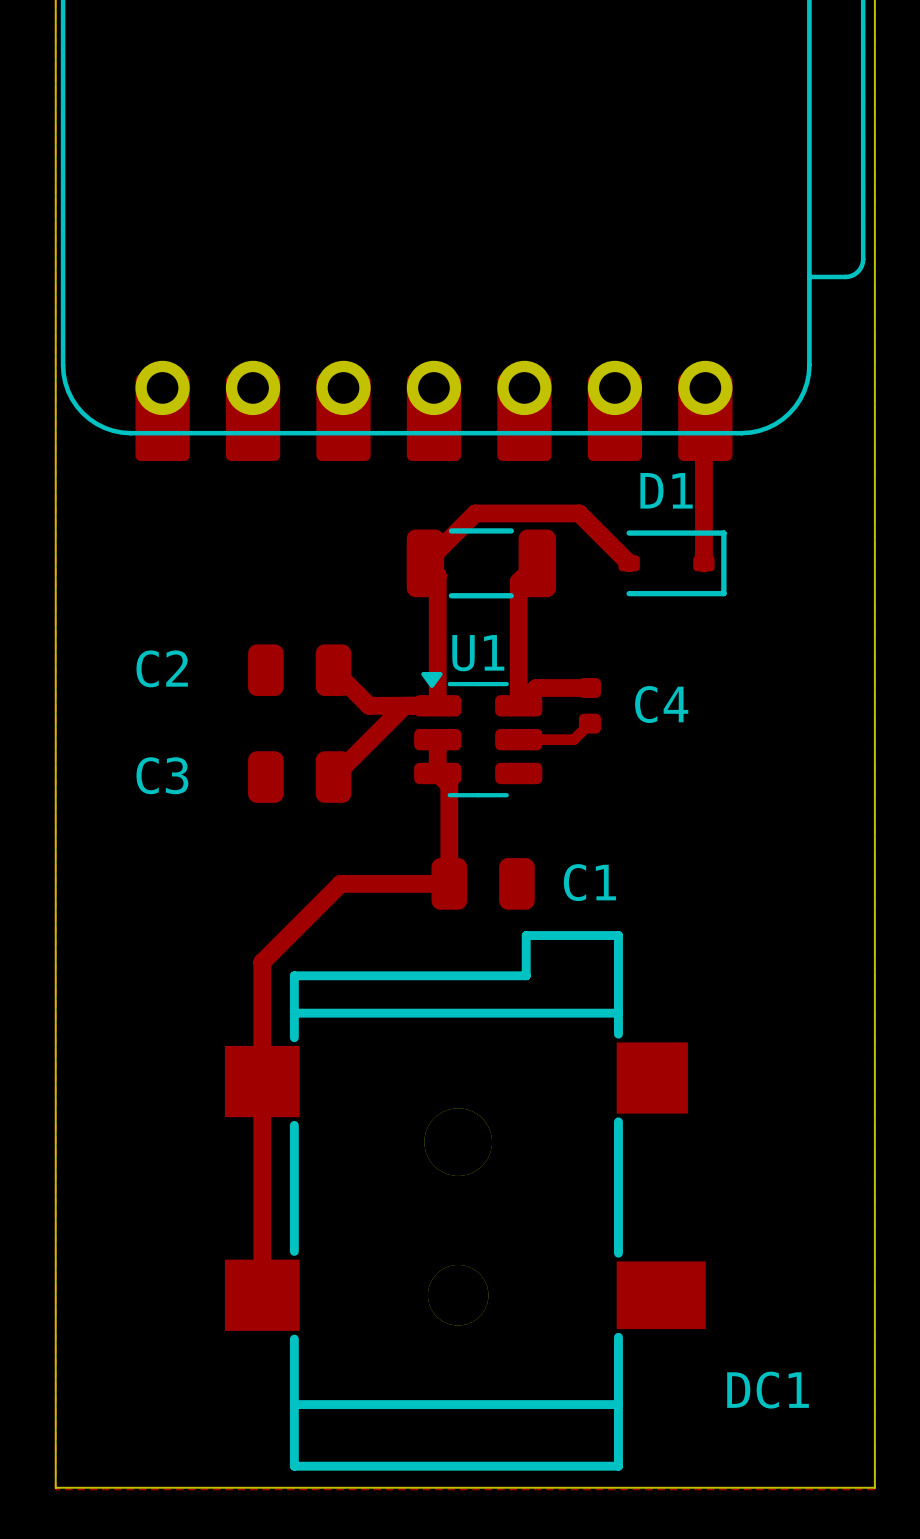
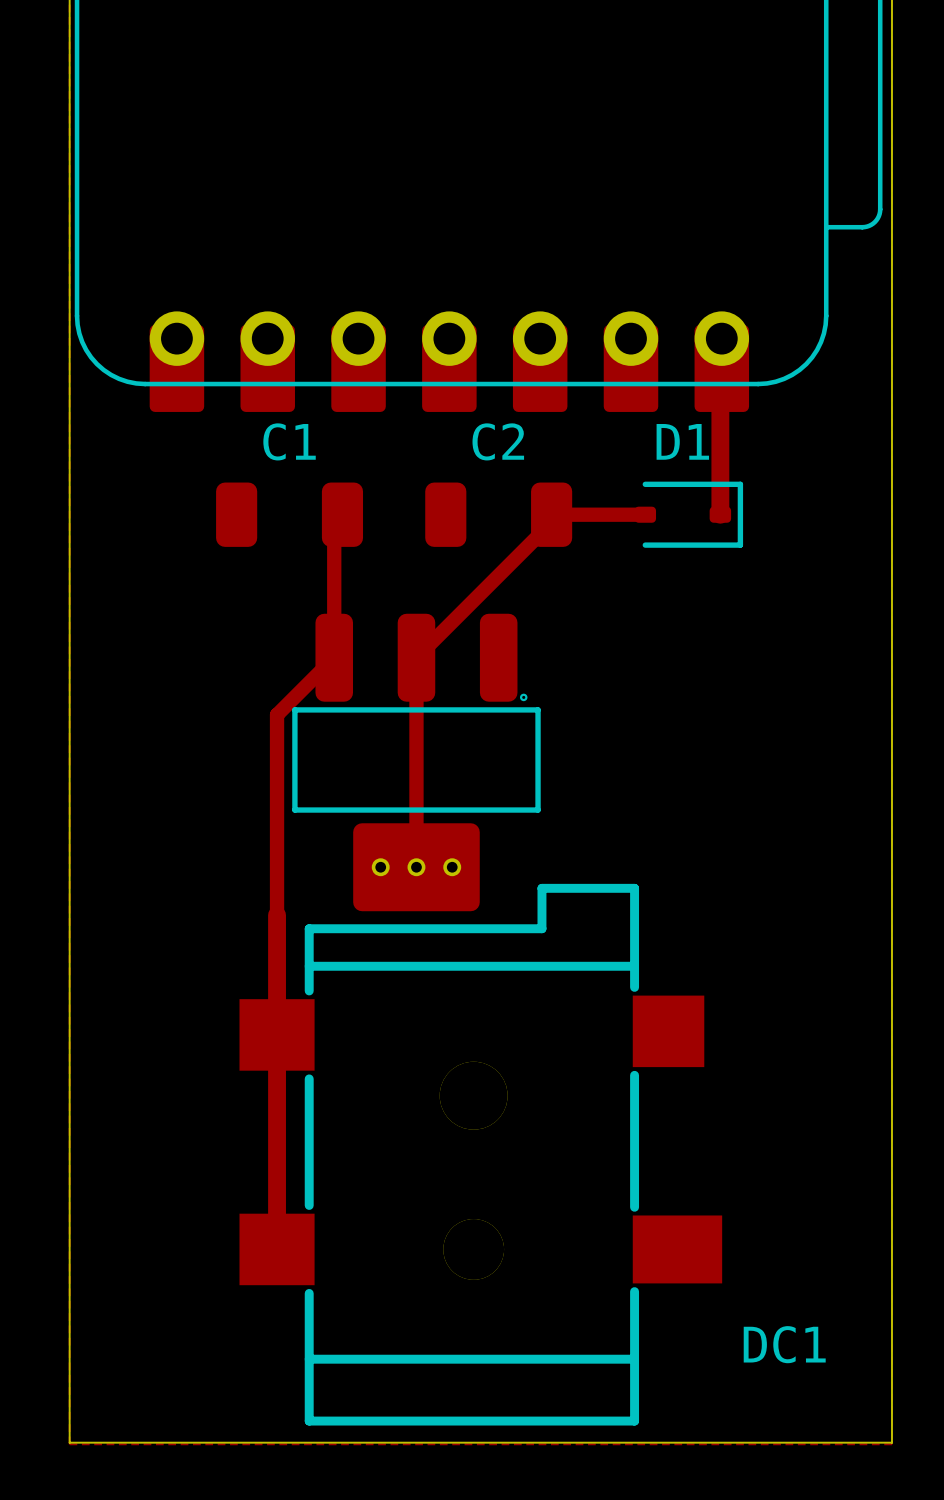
part: (481, 563) -> none
track: (537, 563) (518, 581) (518, 705) (536, 688) (589, 688) -> none
track: (629, 563) (579, 513) (475, 513) (425, 563) (437, 575) (437, 705) (369, 705) (333, 670) -> (645, 514) (551, 514) (551, 522) (416, 657) (416, 867)
C2 footprint: [248, 644, 352, 697] -> [425, 482, 573, 547]
C2 name position: C2 (162, 668) -> C2 (498, 441)
track: (404, 705) (333, 777) -> none
C4: (589, 705) -> none
track: (589, 723) (573, 739) (518, 739) -> none
U1: (478, 734) -> none
track: (437, 739) (437, 773) (449, 785) (449, 883) (340, 883) (262, 962) -> (342, 514) (334, 522) (334, 657) (277, 714) (277, 915)
C3: (299, 777) -> none
part: none -> (416, 762)
C1 footprint: [431, 858, 535, 910] -> [216, 482, 364, 547]
C1 name position: C1 (589, 882) -> C1 (289, 441)

